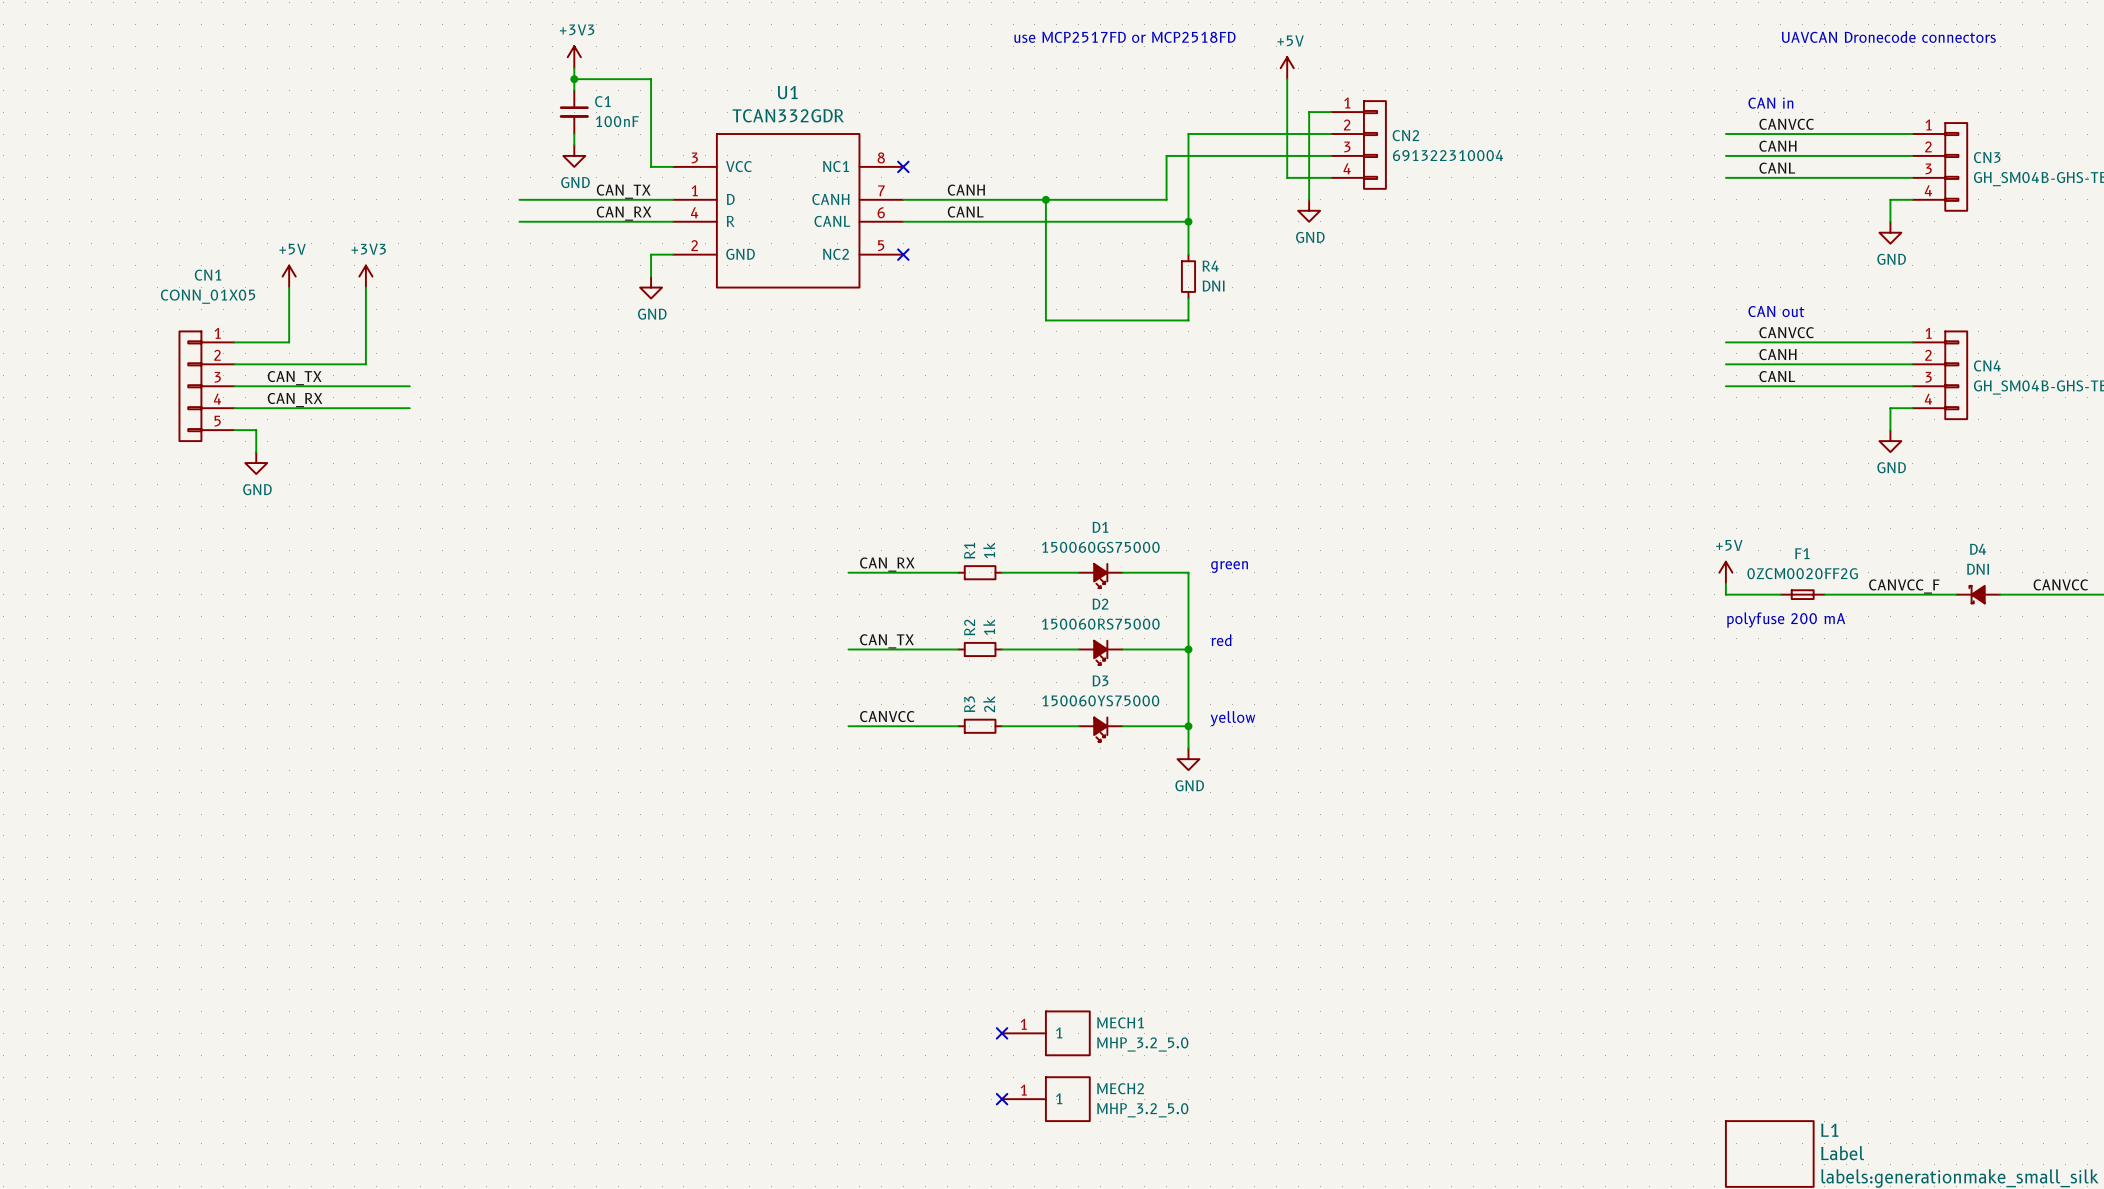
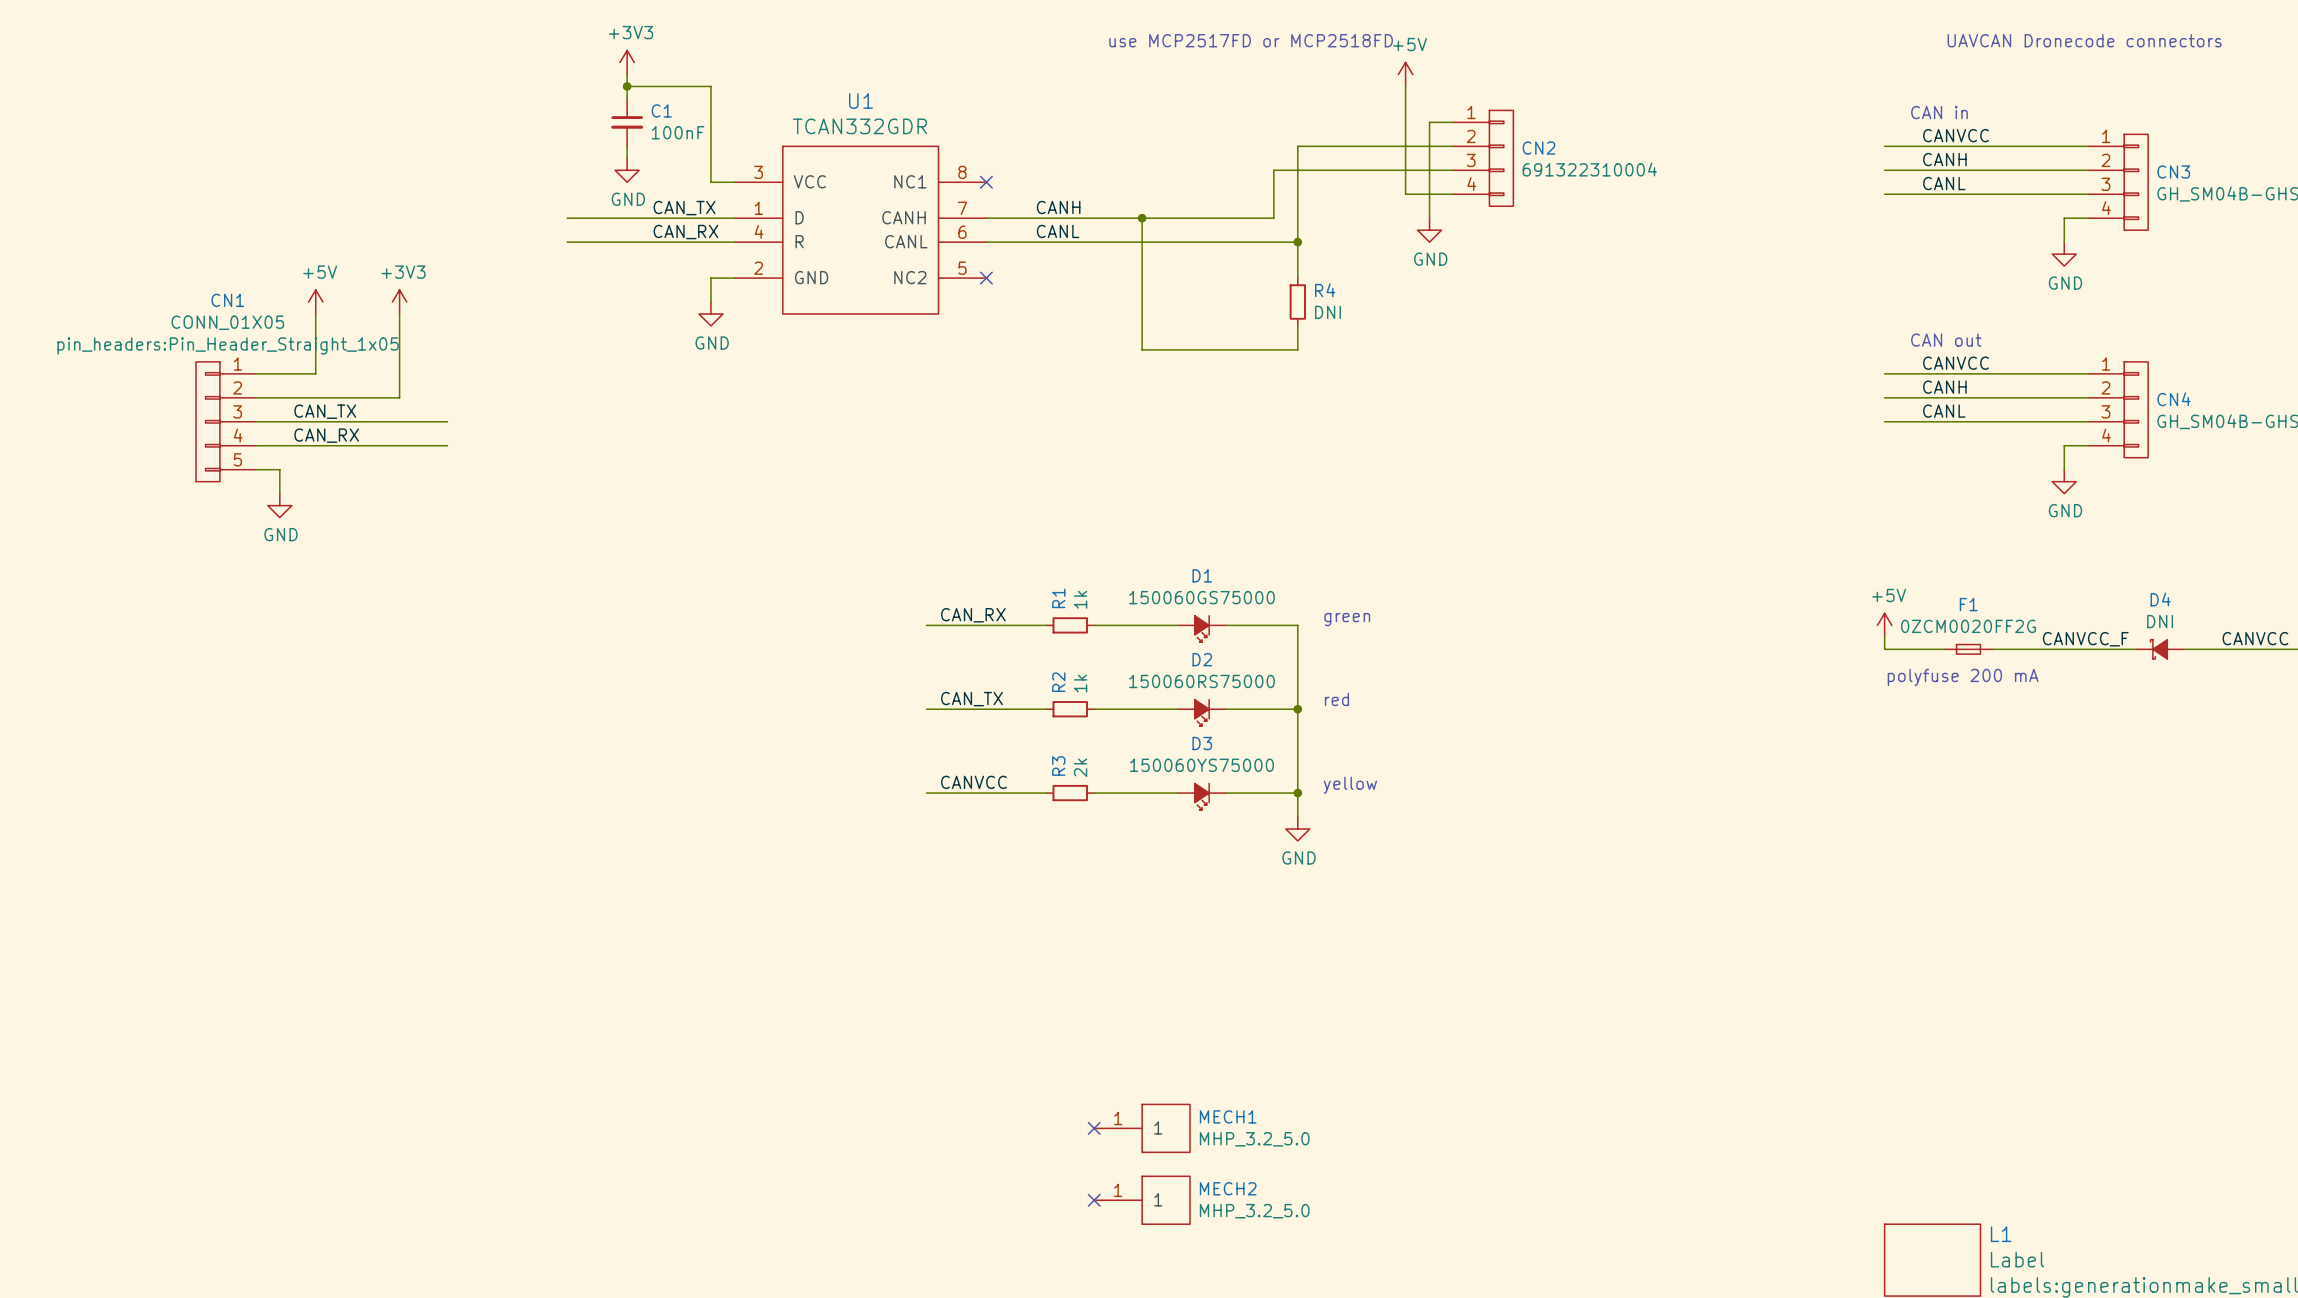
CN1 text: none -> pin_headers:Pin_Header_Straight_1x05 (228, 345)

